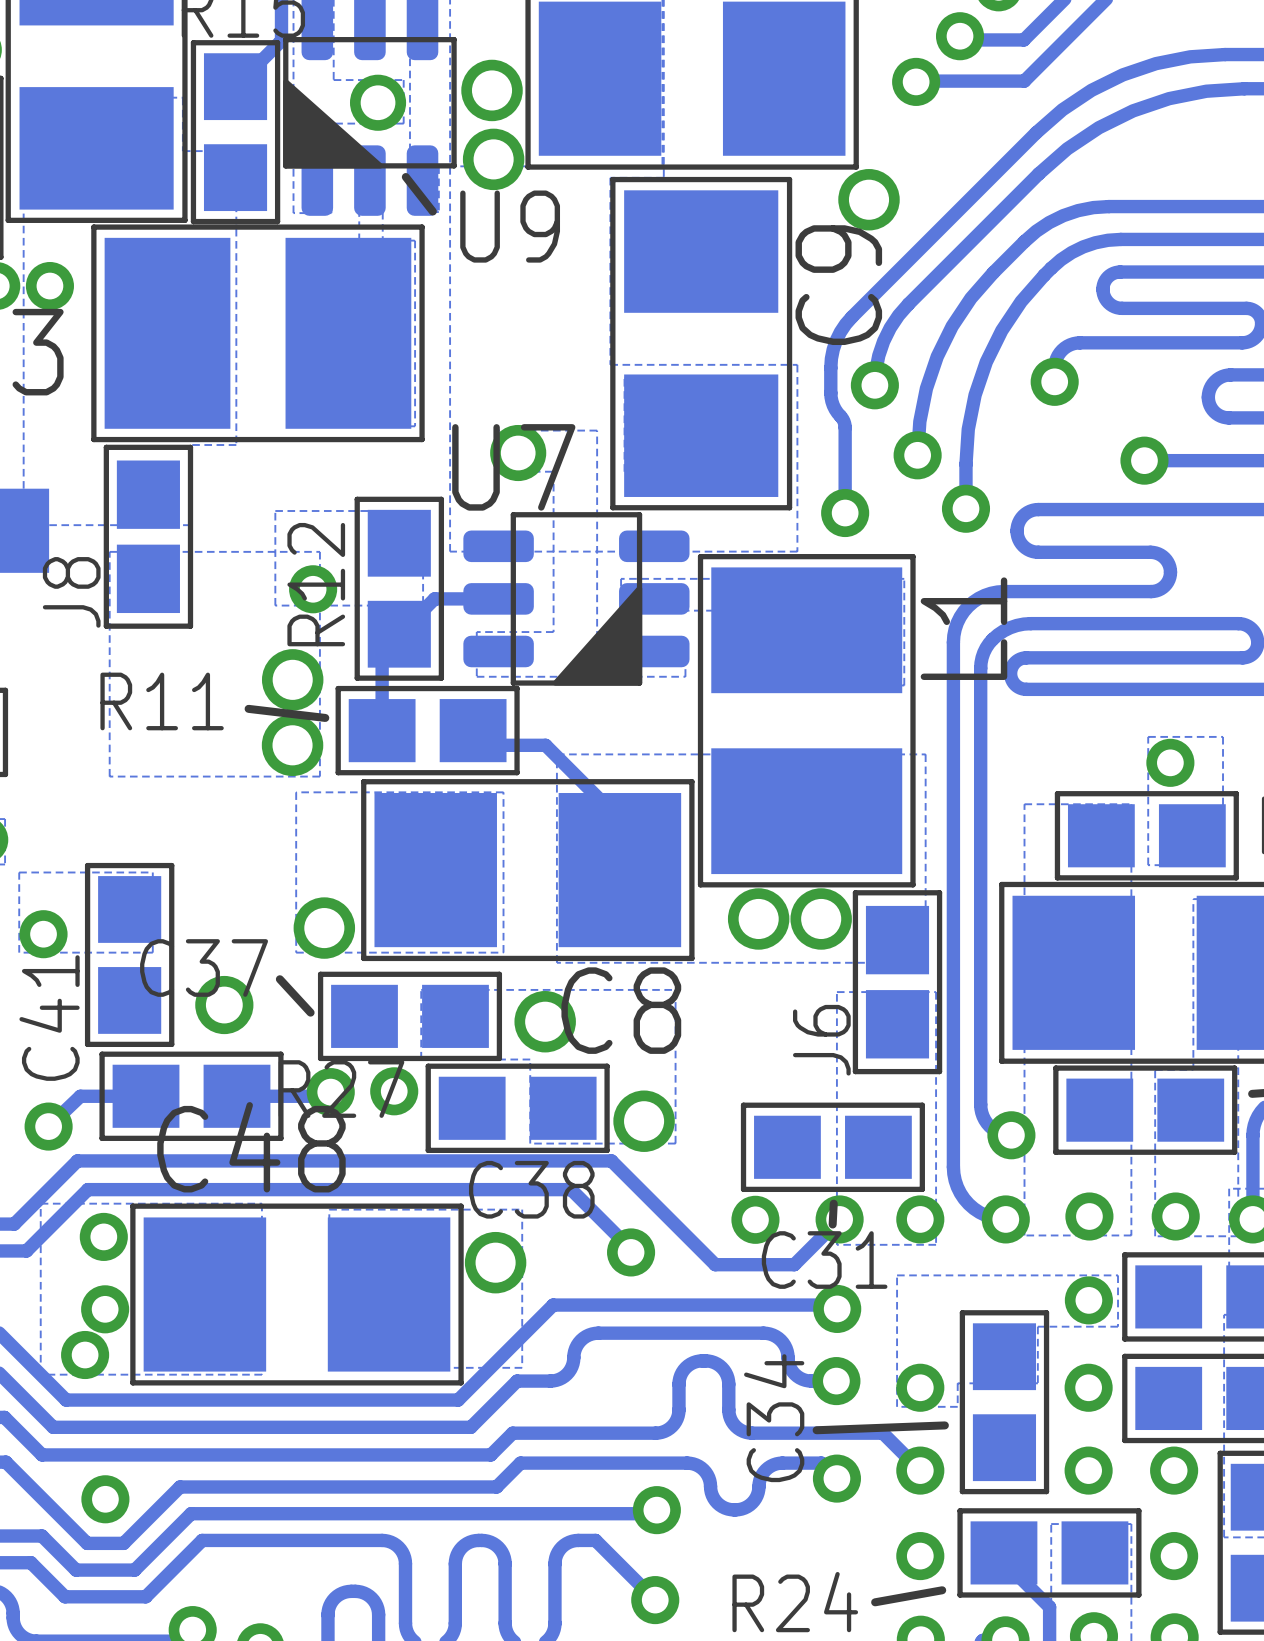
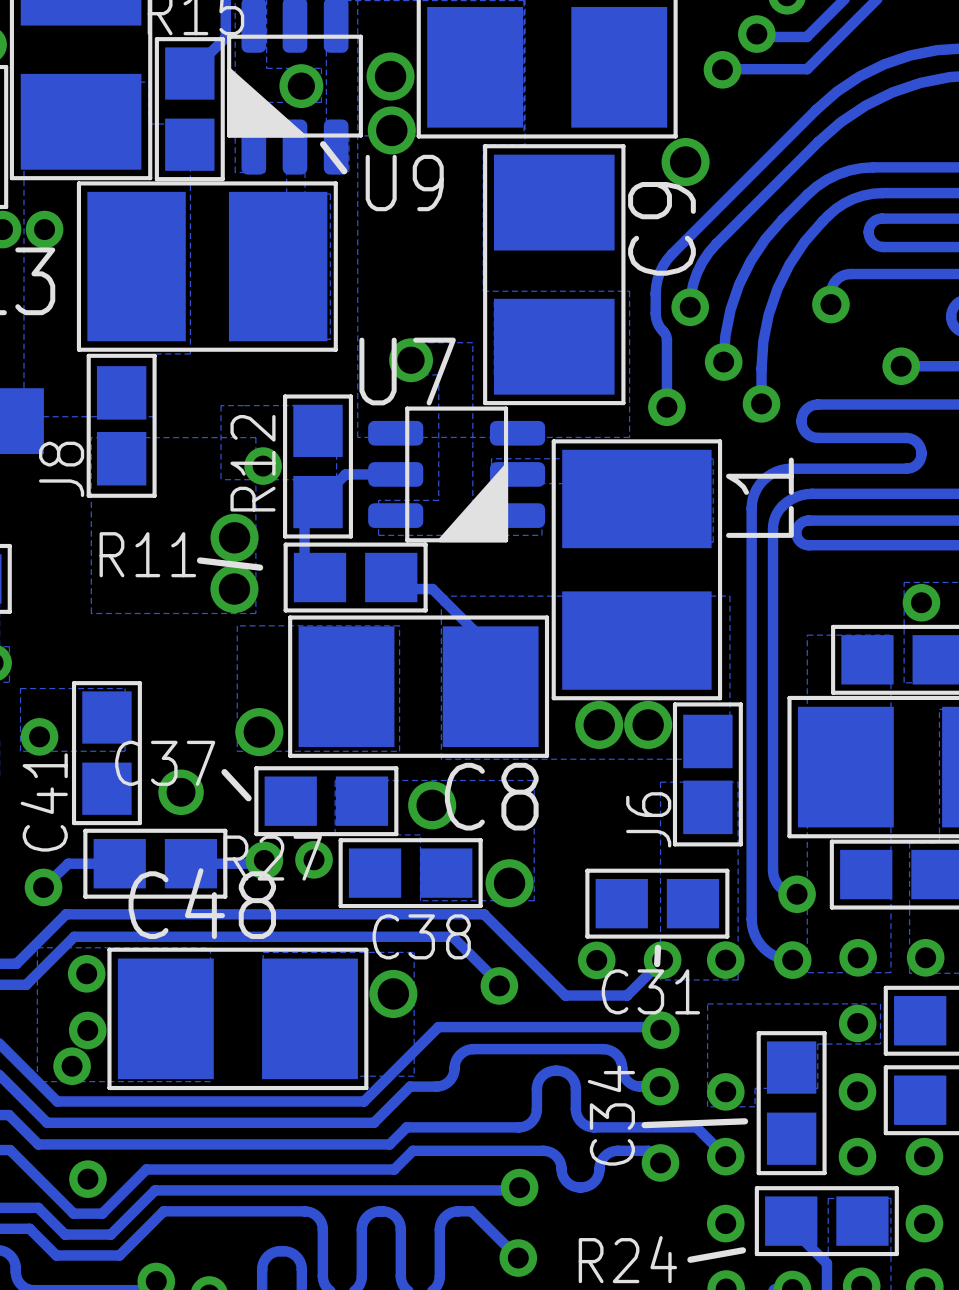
via position: (313, 589) -> (263, 466)
R11 position: (427, 730) -> (355, 577)

